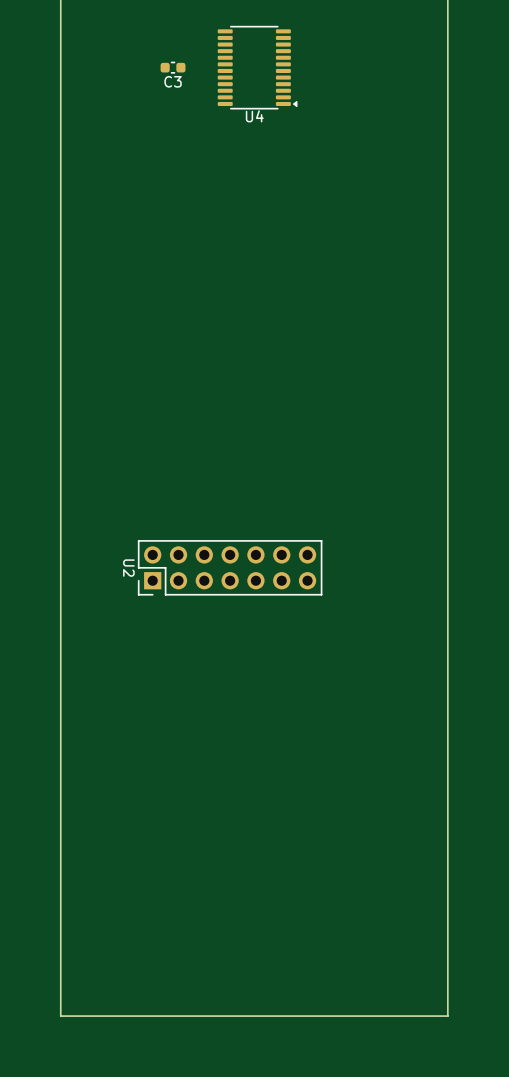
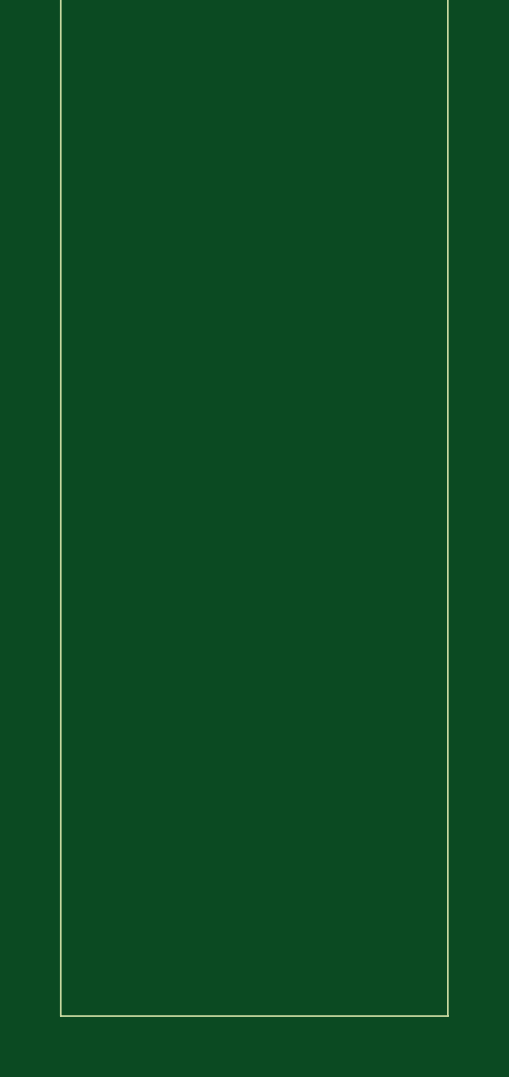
C3: (173, 67) -> none
U4: (257, 67) -> none
U2: (230, 567) -> none

